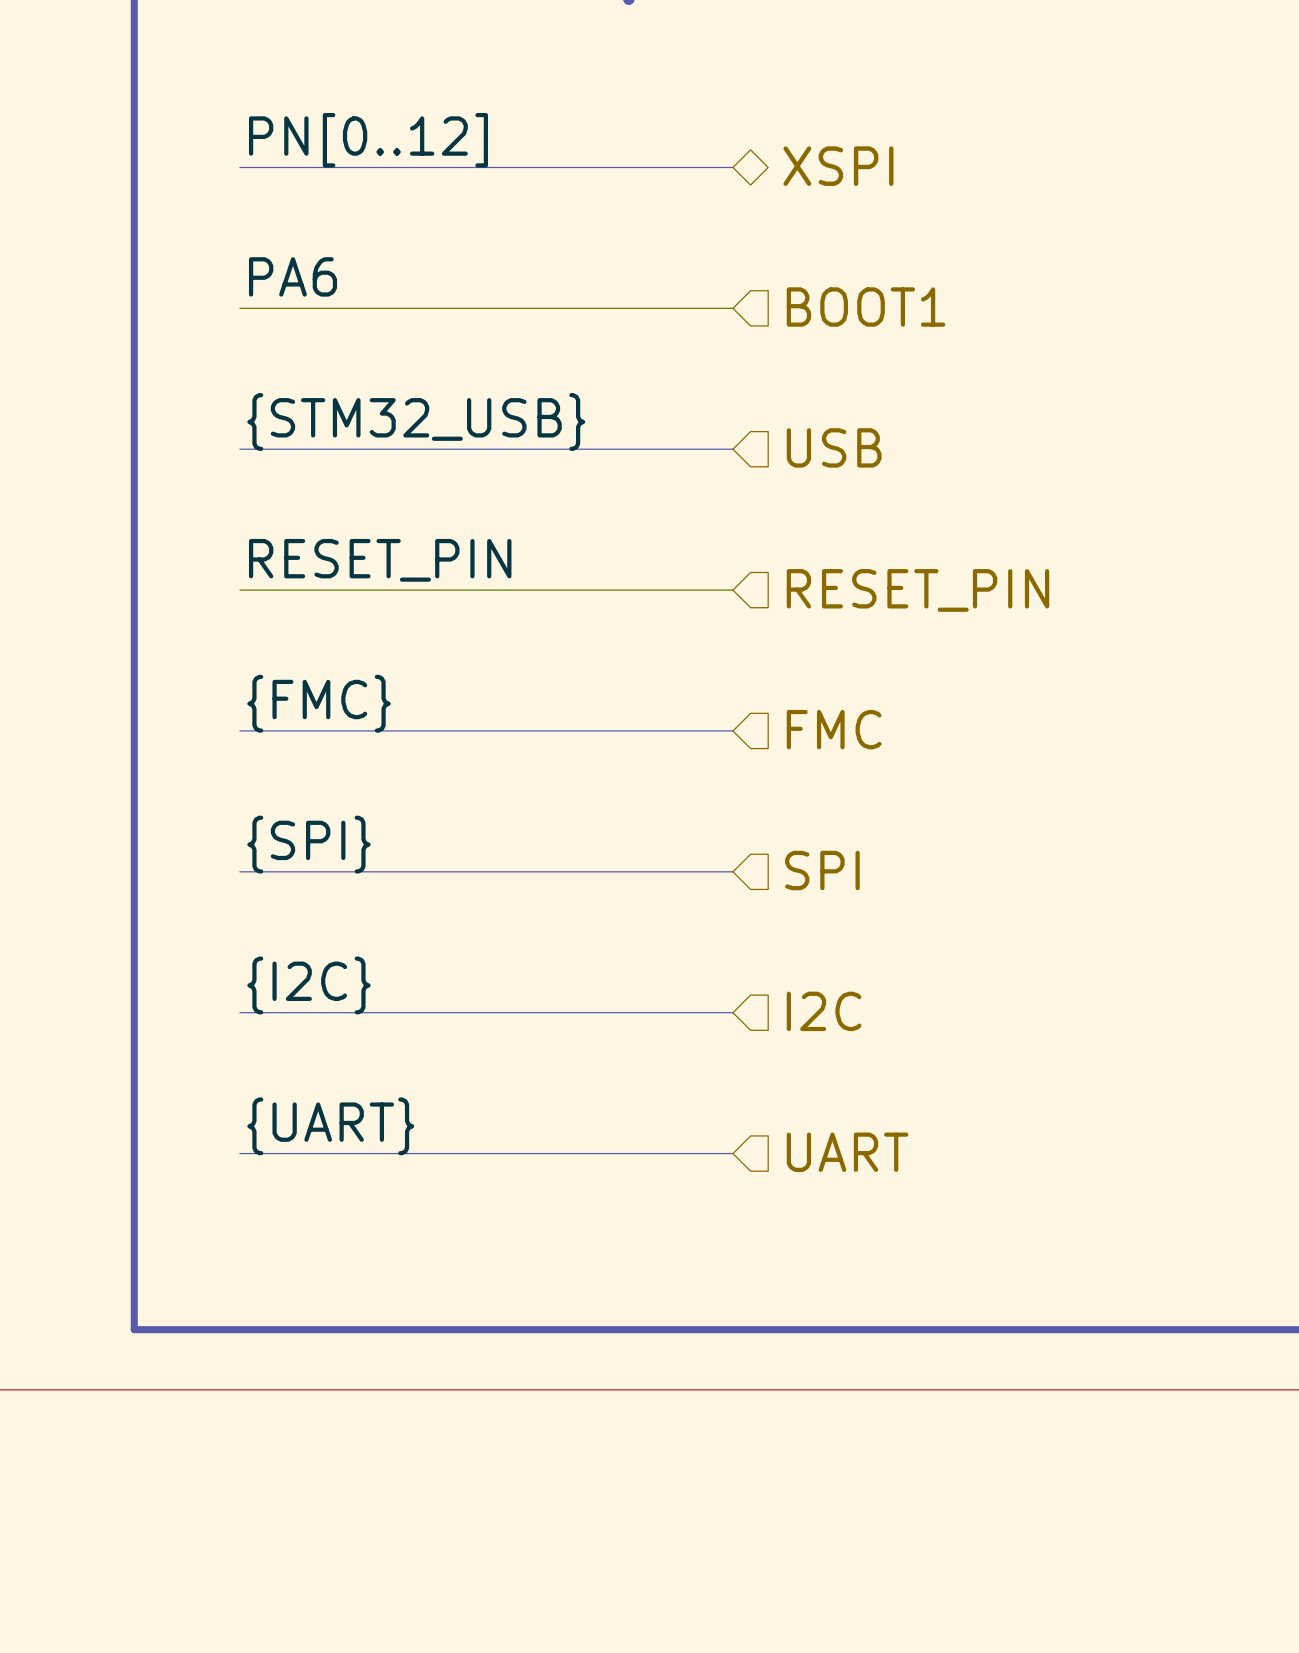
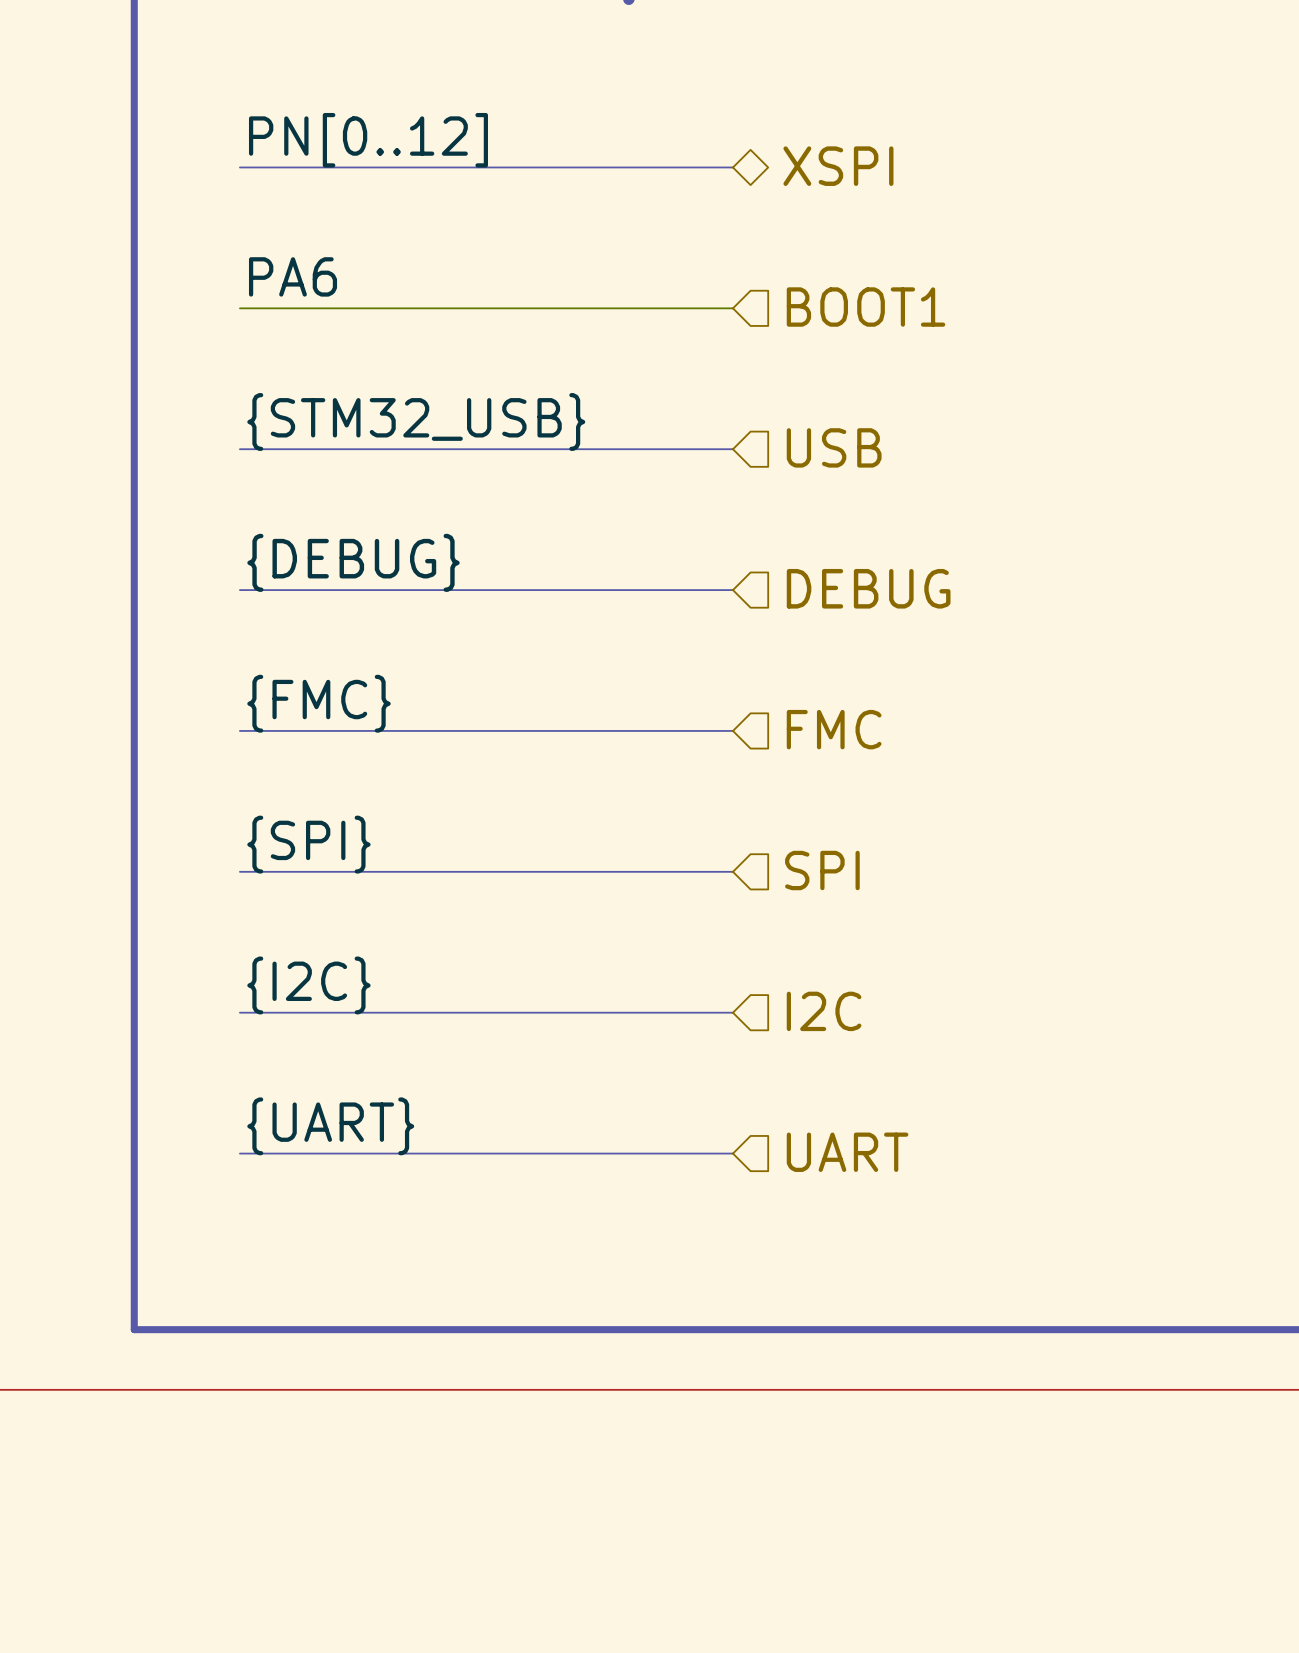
label: RESET_PIN (380, 560) -> {DEBUG} (353, 562)
bus: none -> (239, 590) (732, 590)
hierarchical label: RESET_PIN (917, 590) -> DEBUG (868, 588)

